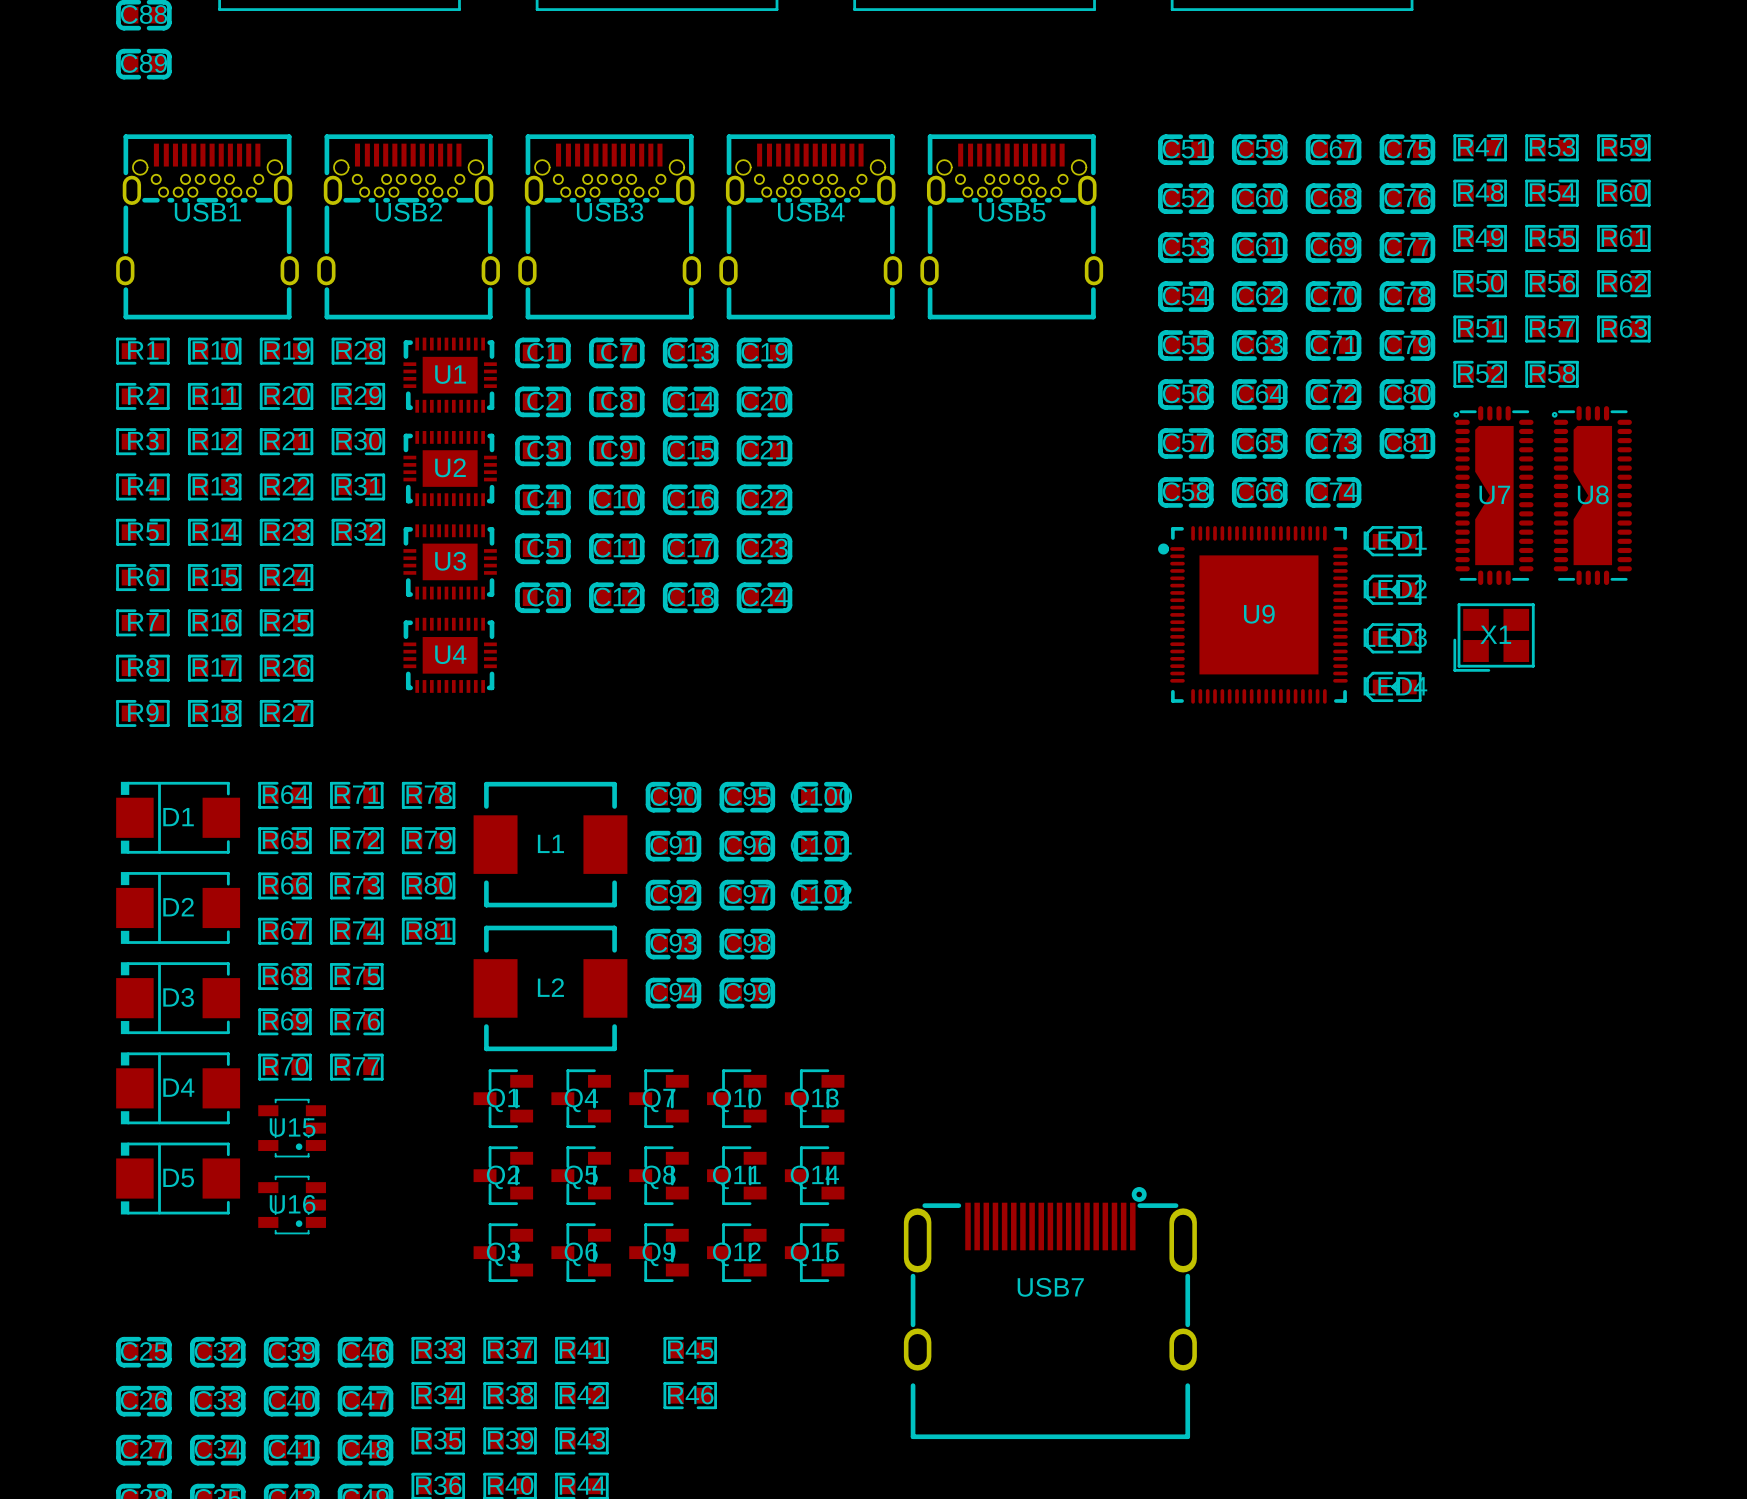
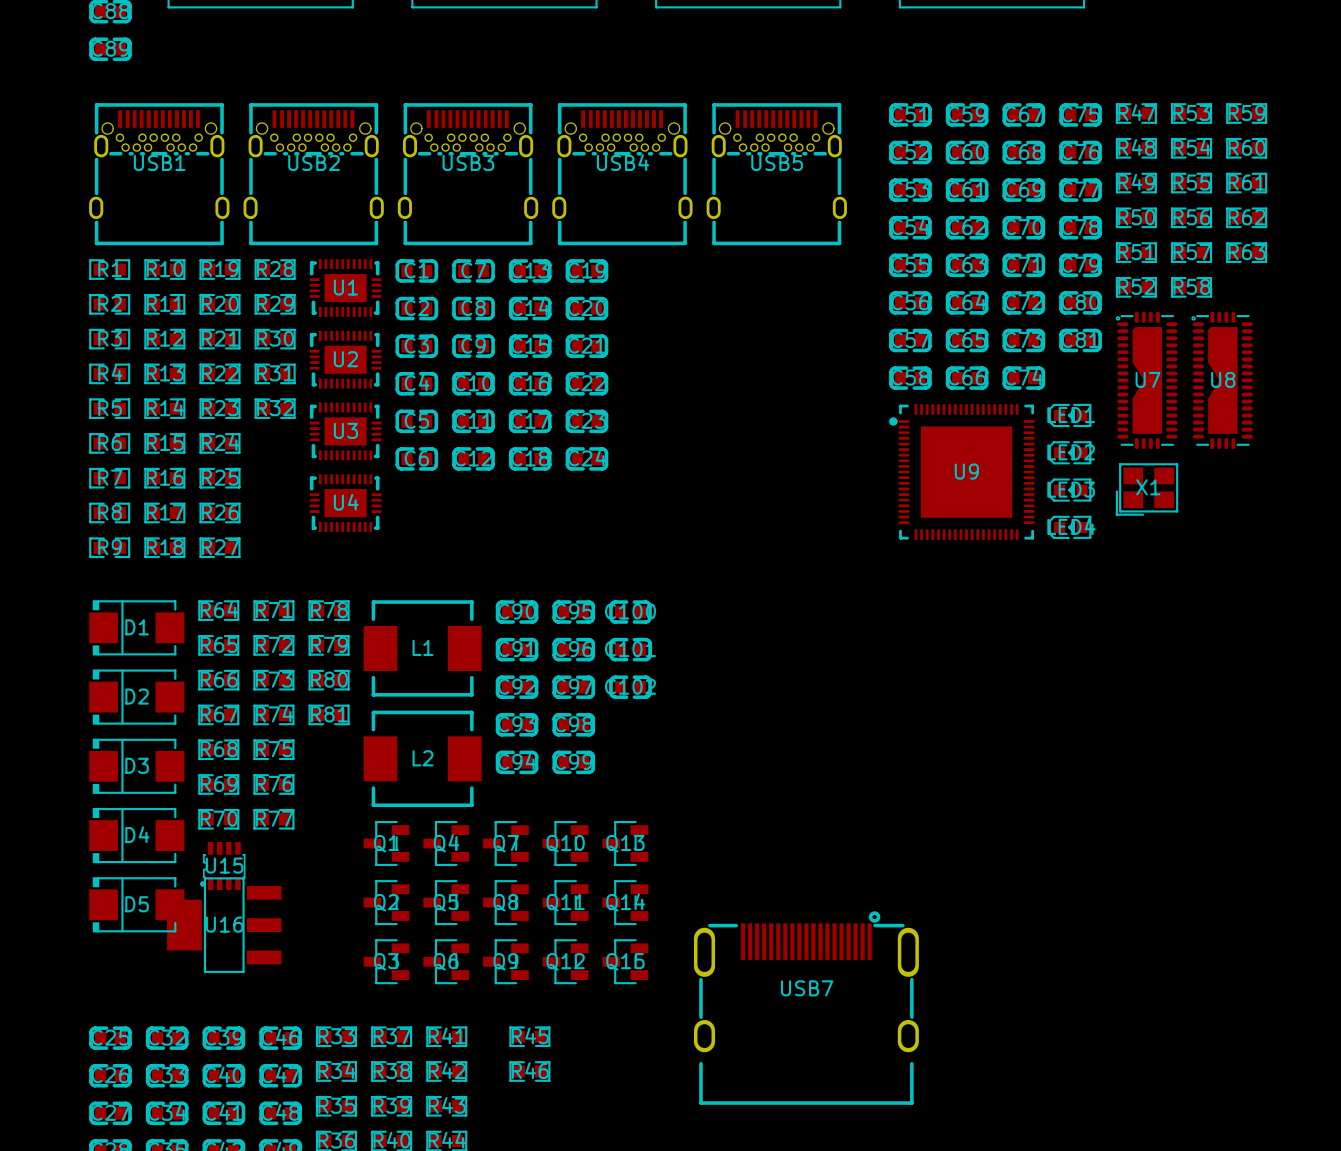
U15 footprint: [258, 1098, 326, 1158] -> [200, 842, 246, 891]
U16 footprint: [258, 1175, 326, 1235] -> [167, 877, 282, 973]

